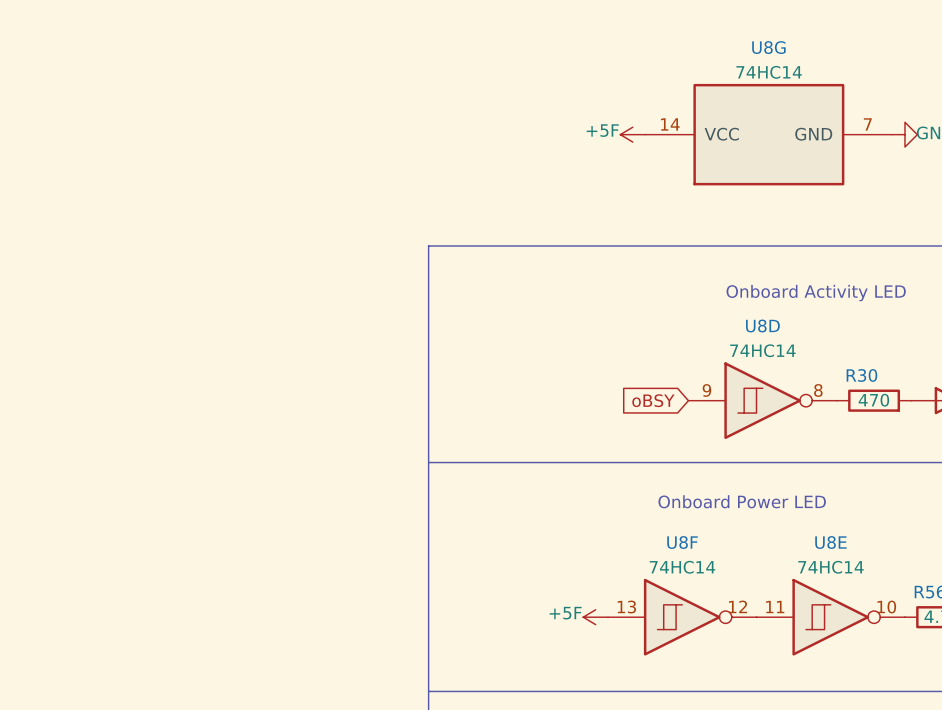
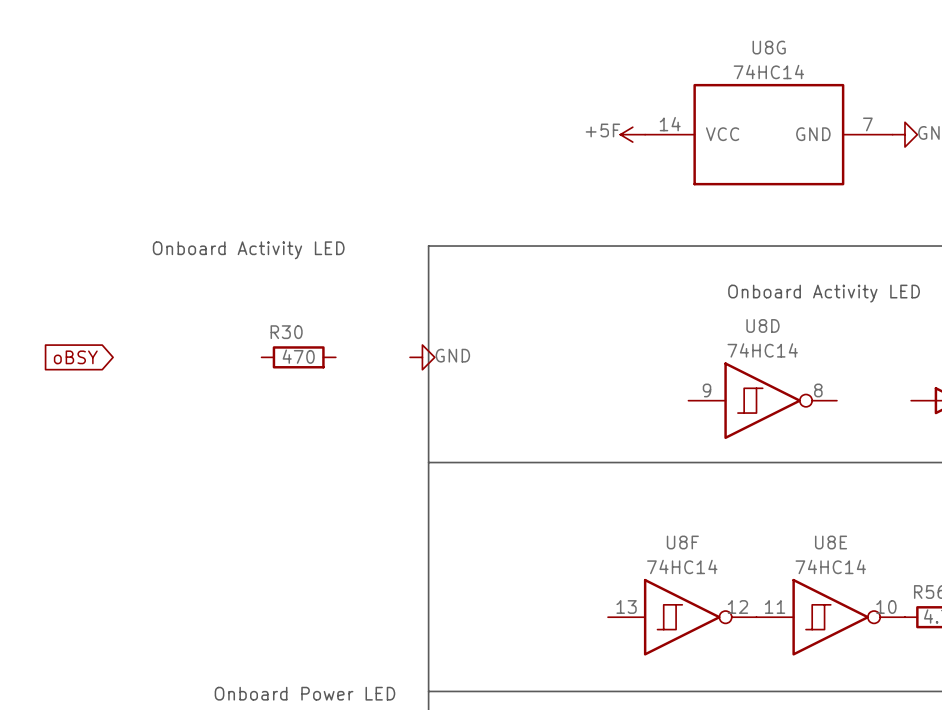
text: none -> Onboard Activity LED (248, 250)
global label: none -> oBSY (75, 357)
power symbol: none -> GND (422, 357)
global label: oBSY (653, 400) -> none
R30 position: (874, 400) -> (298, 357)
text: Onboard Power LED (742, 501) -> none
power symbol: +5F (595, 617) -> none
text: none -> Onboard Power LED (304, 693)

